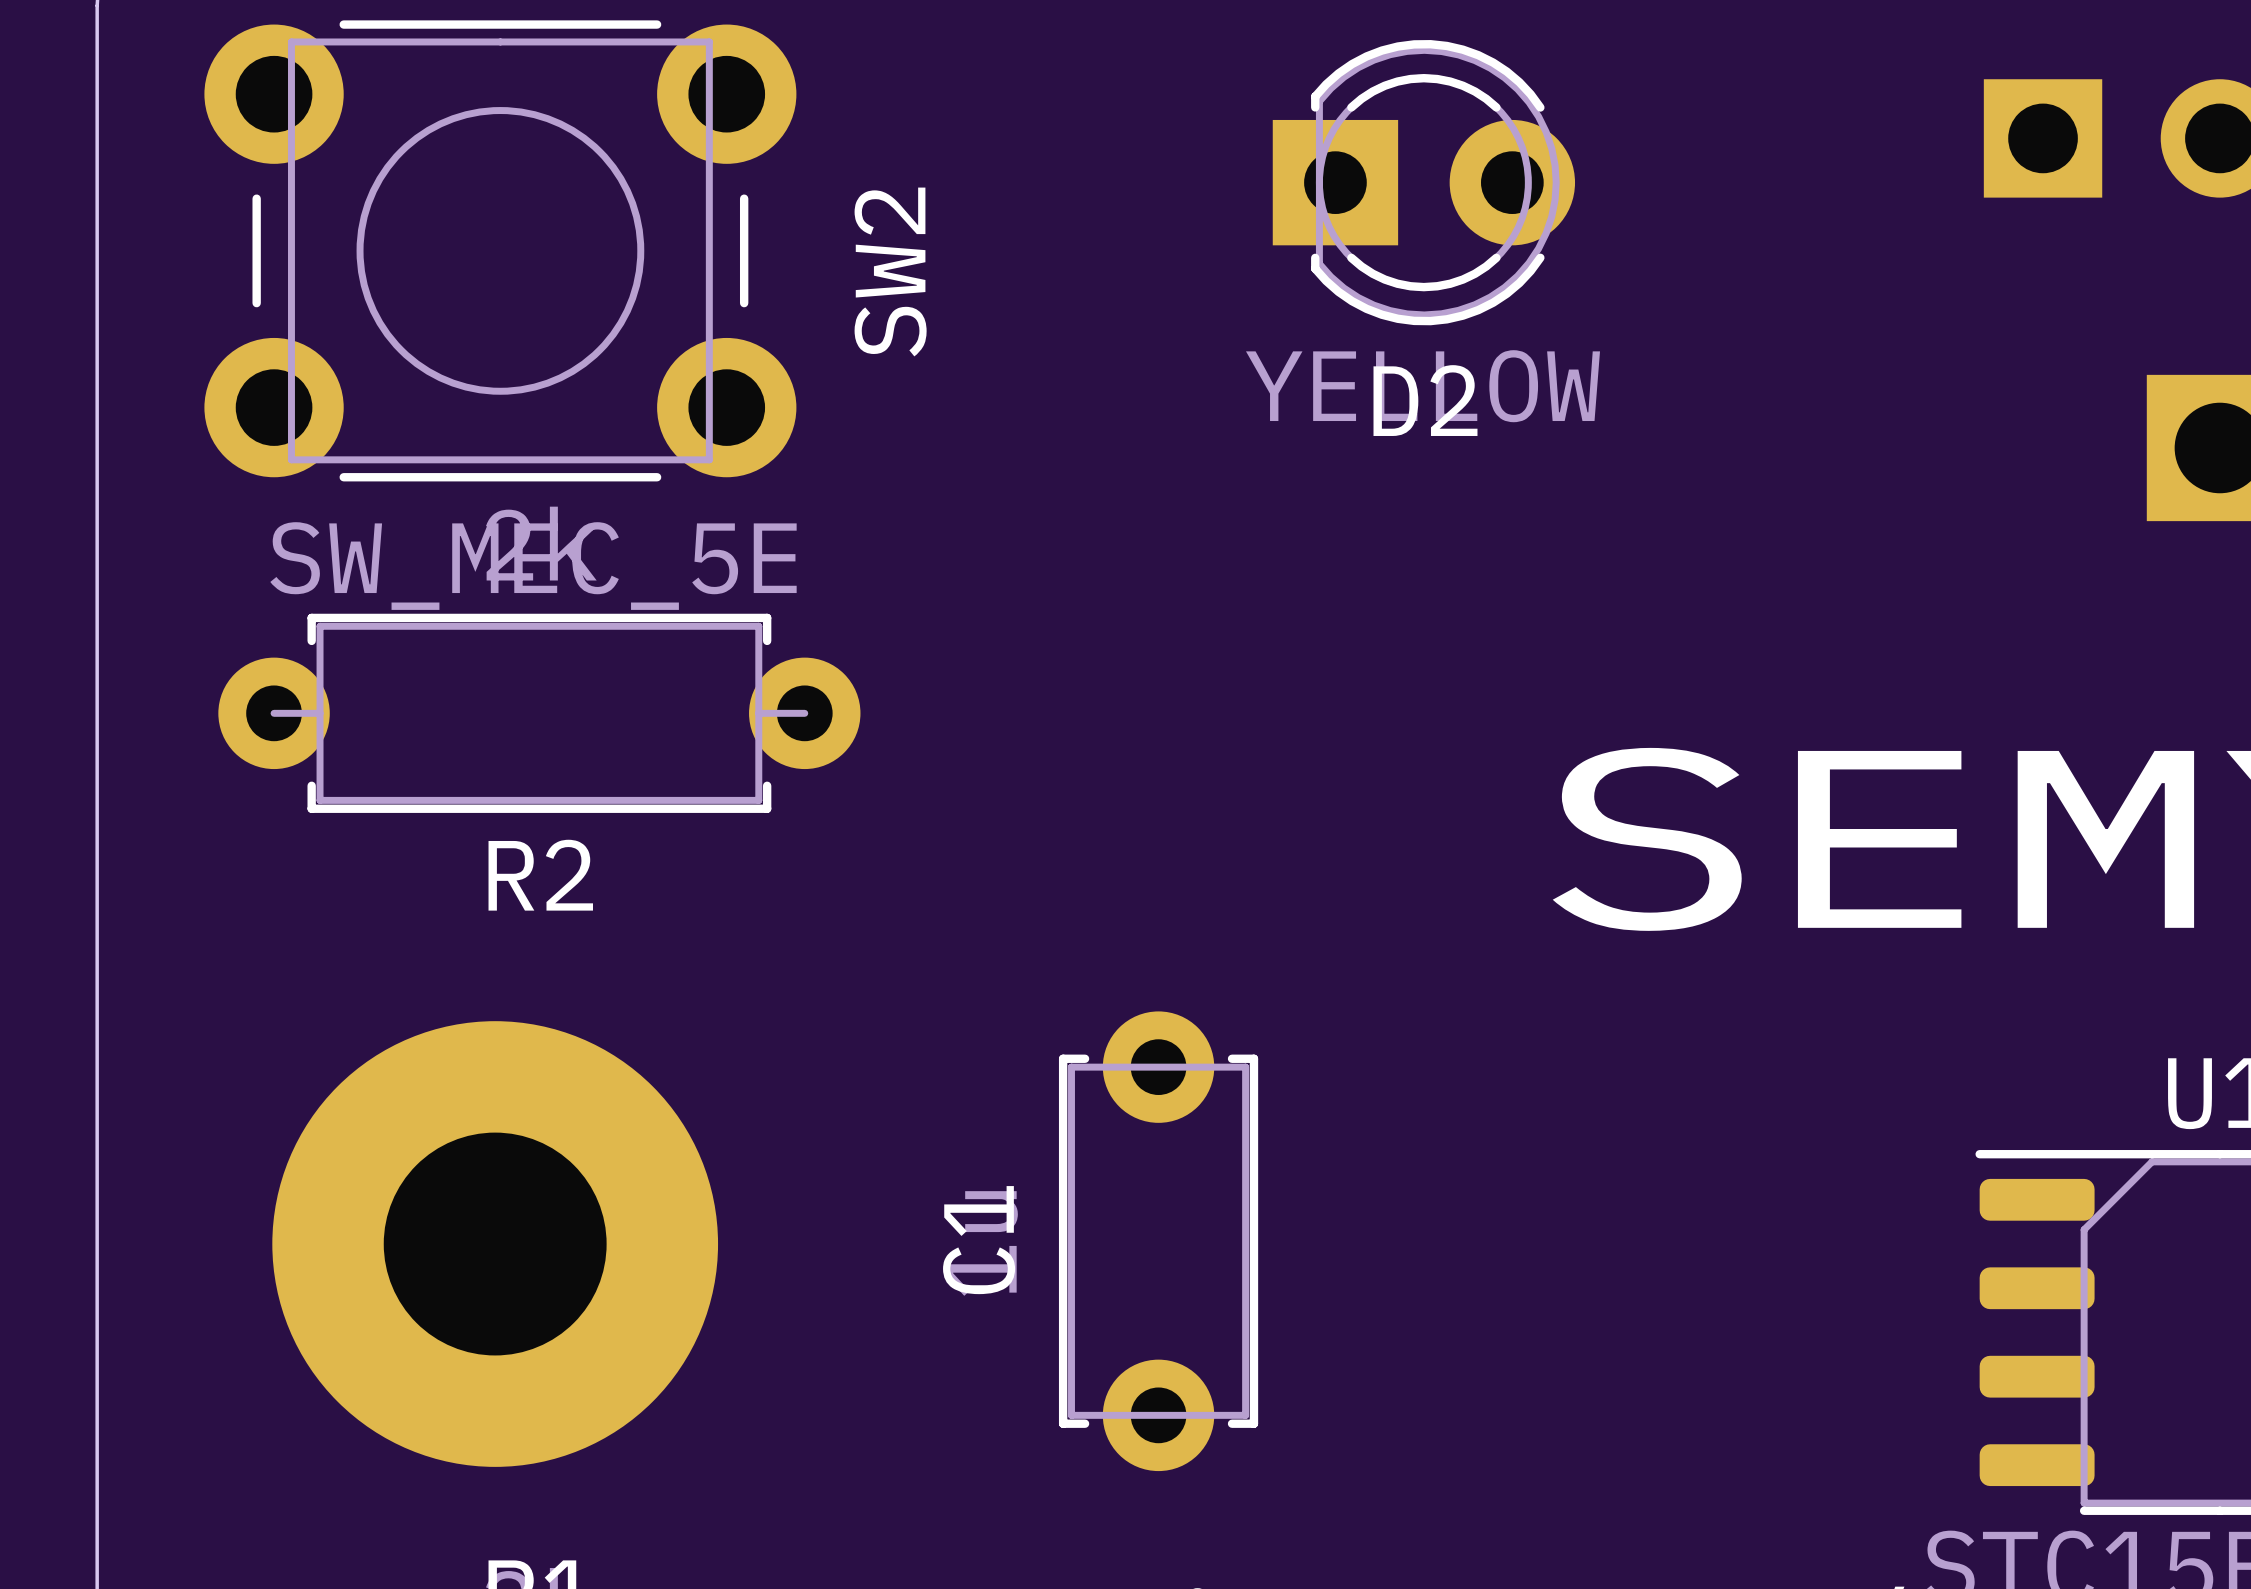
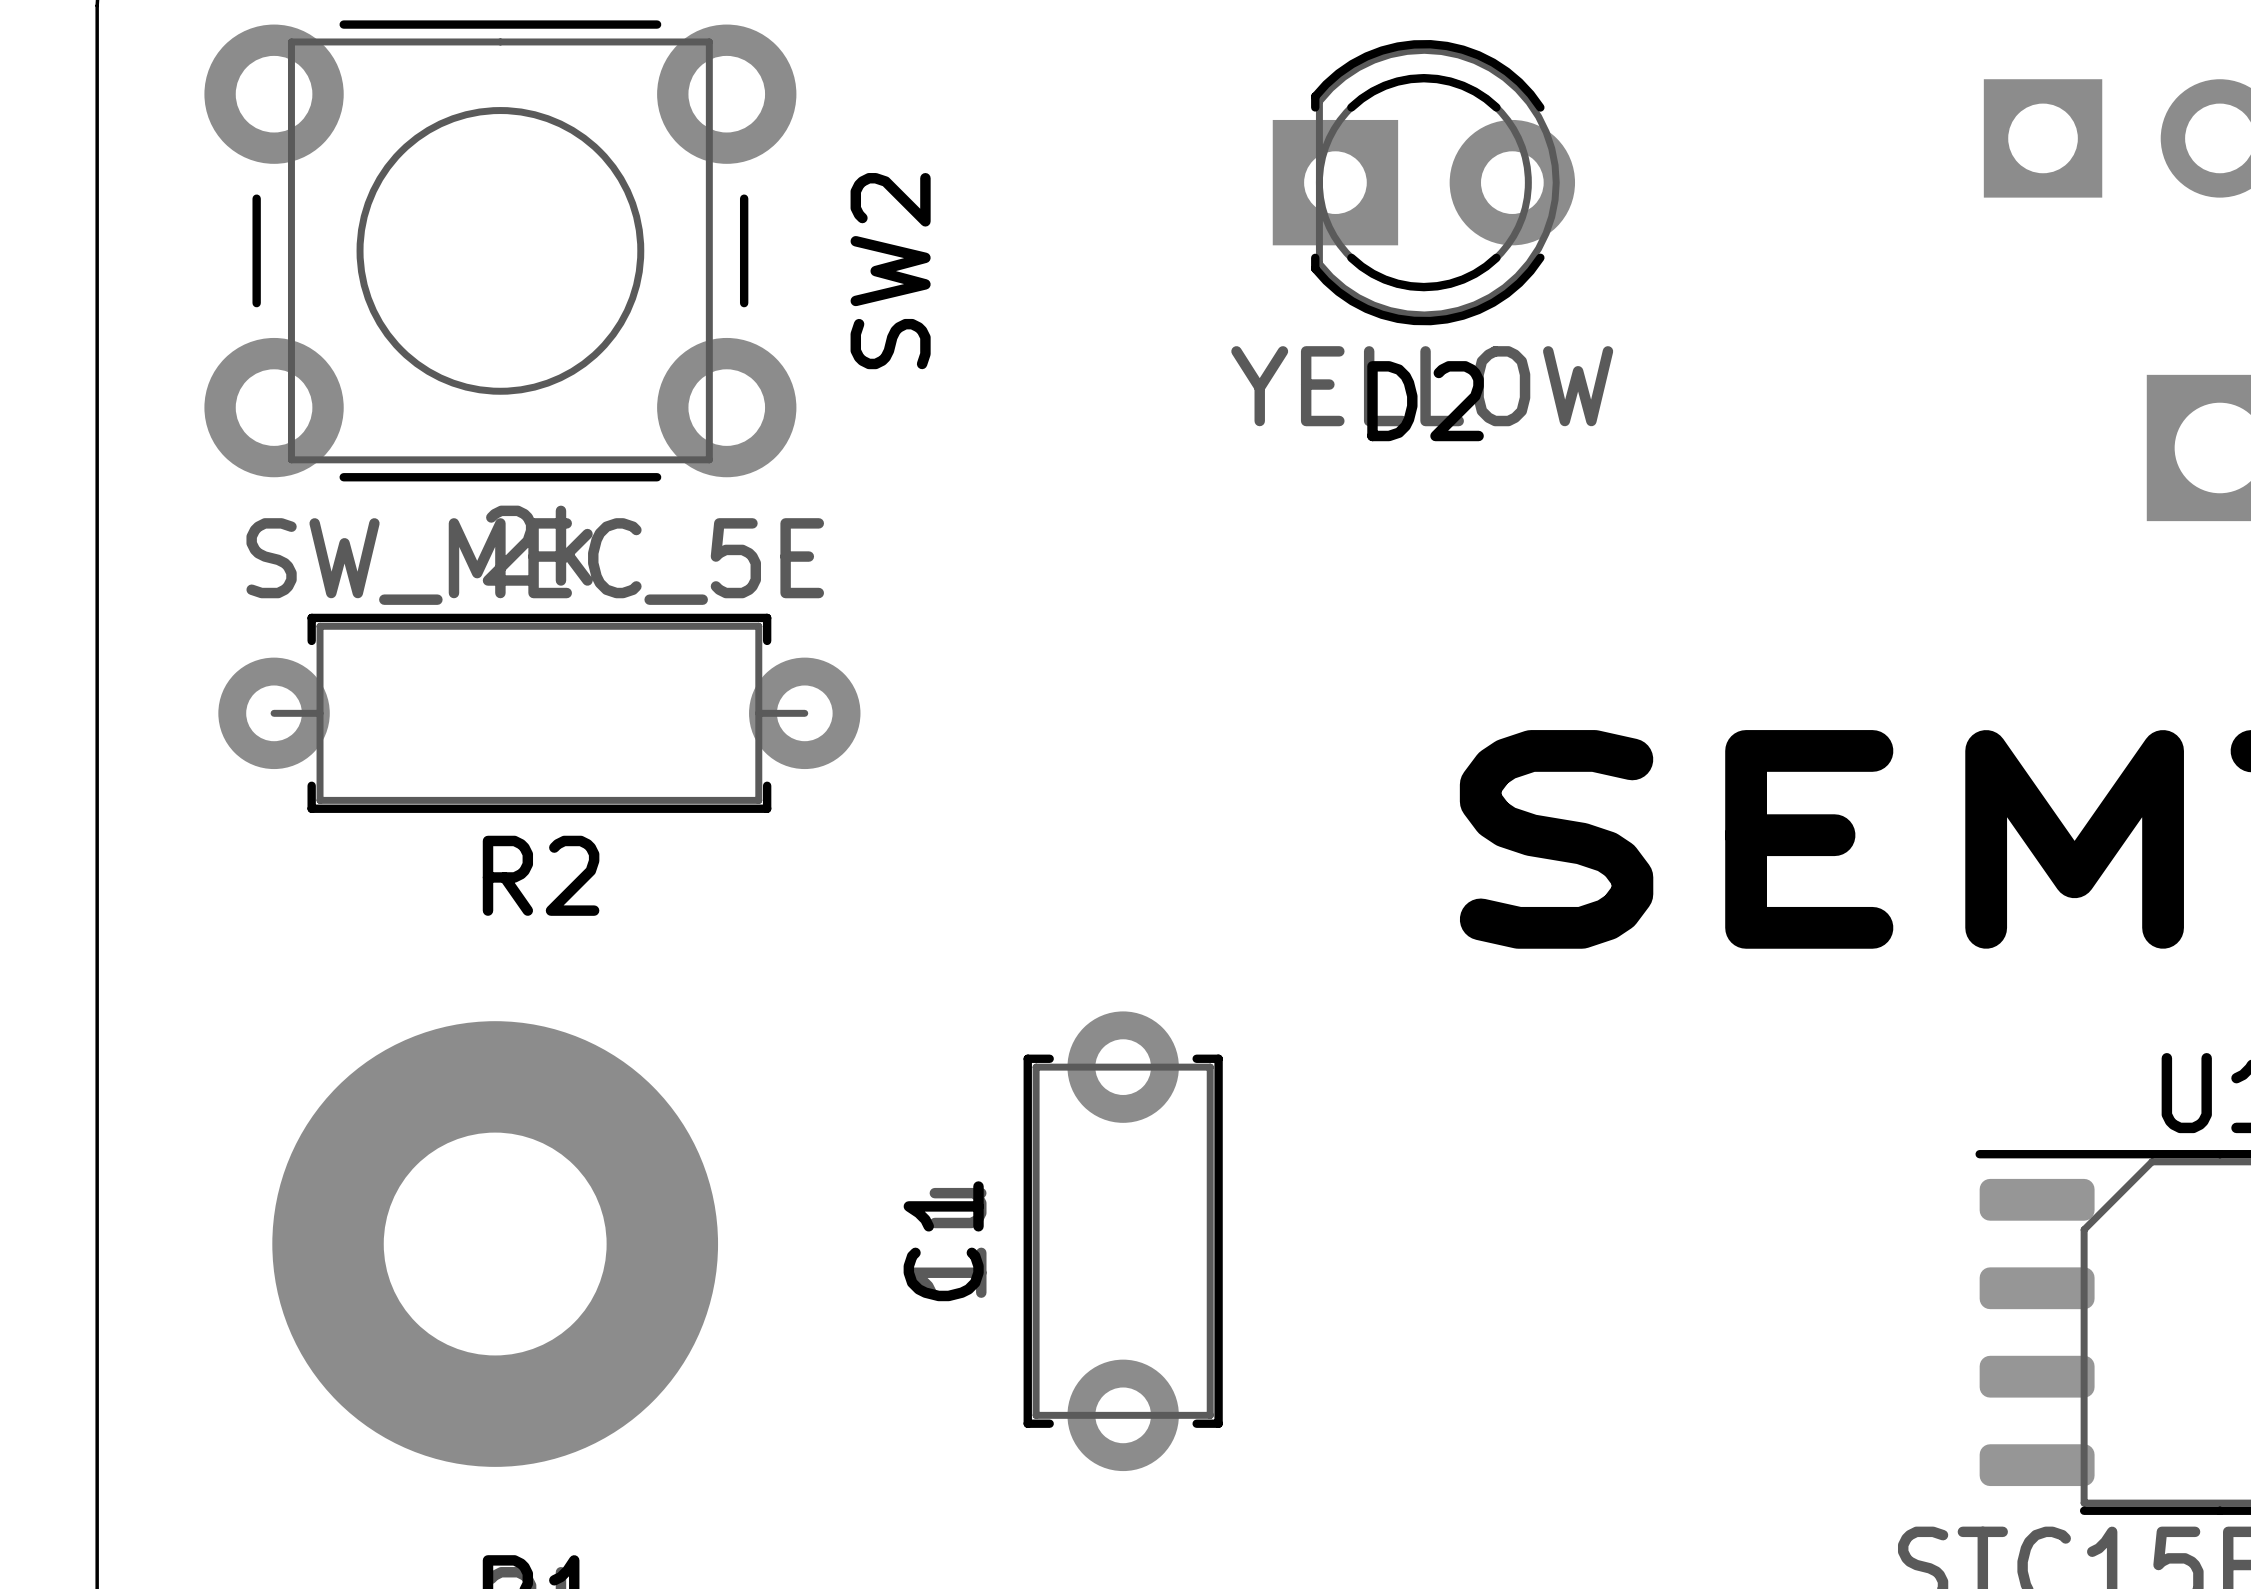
C1 position: (1158, 1241) -> (1123, 1241)

